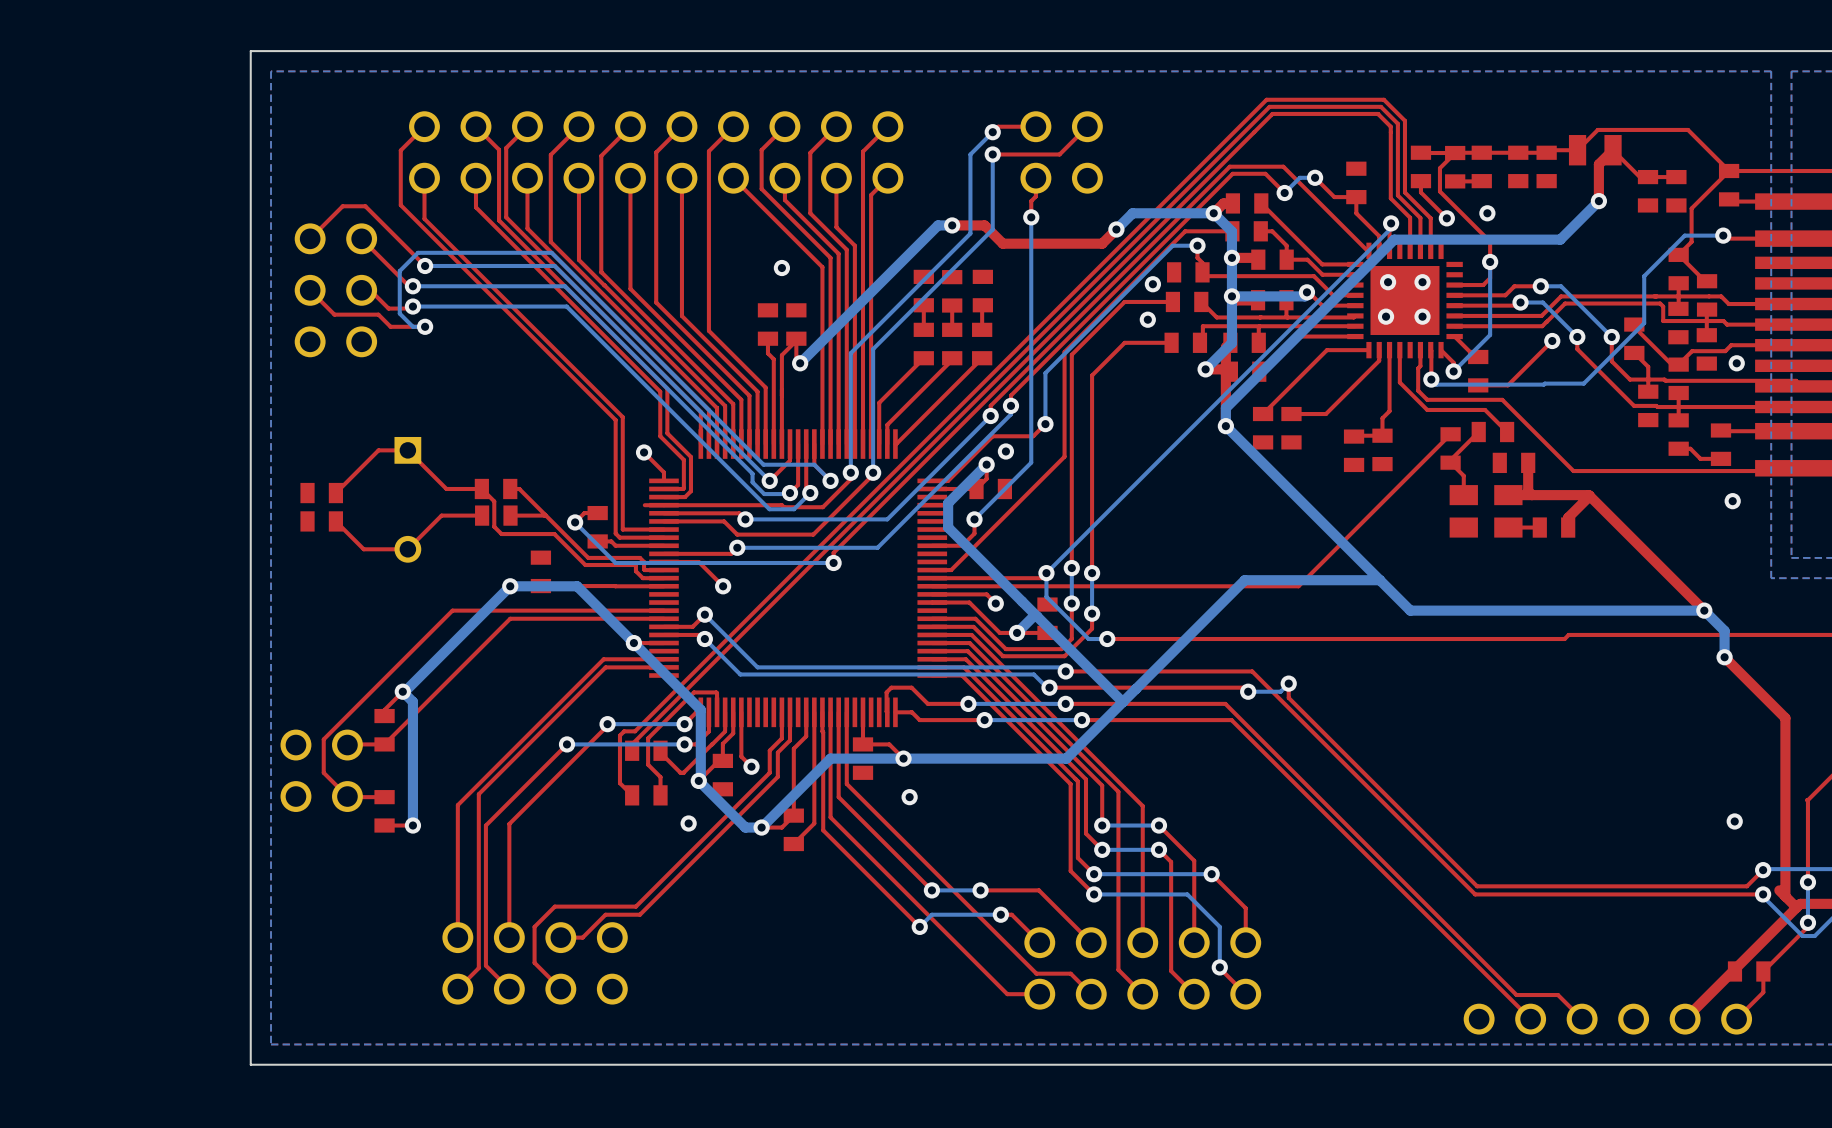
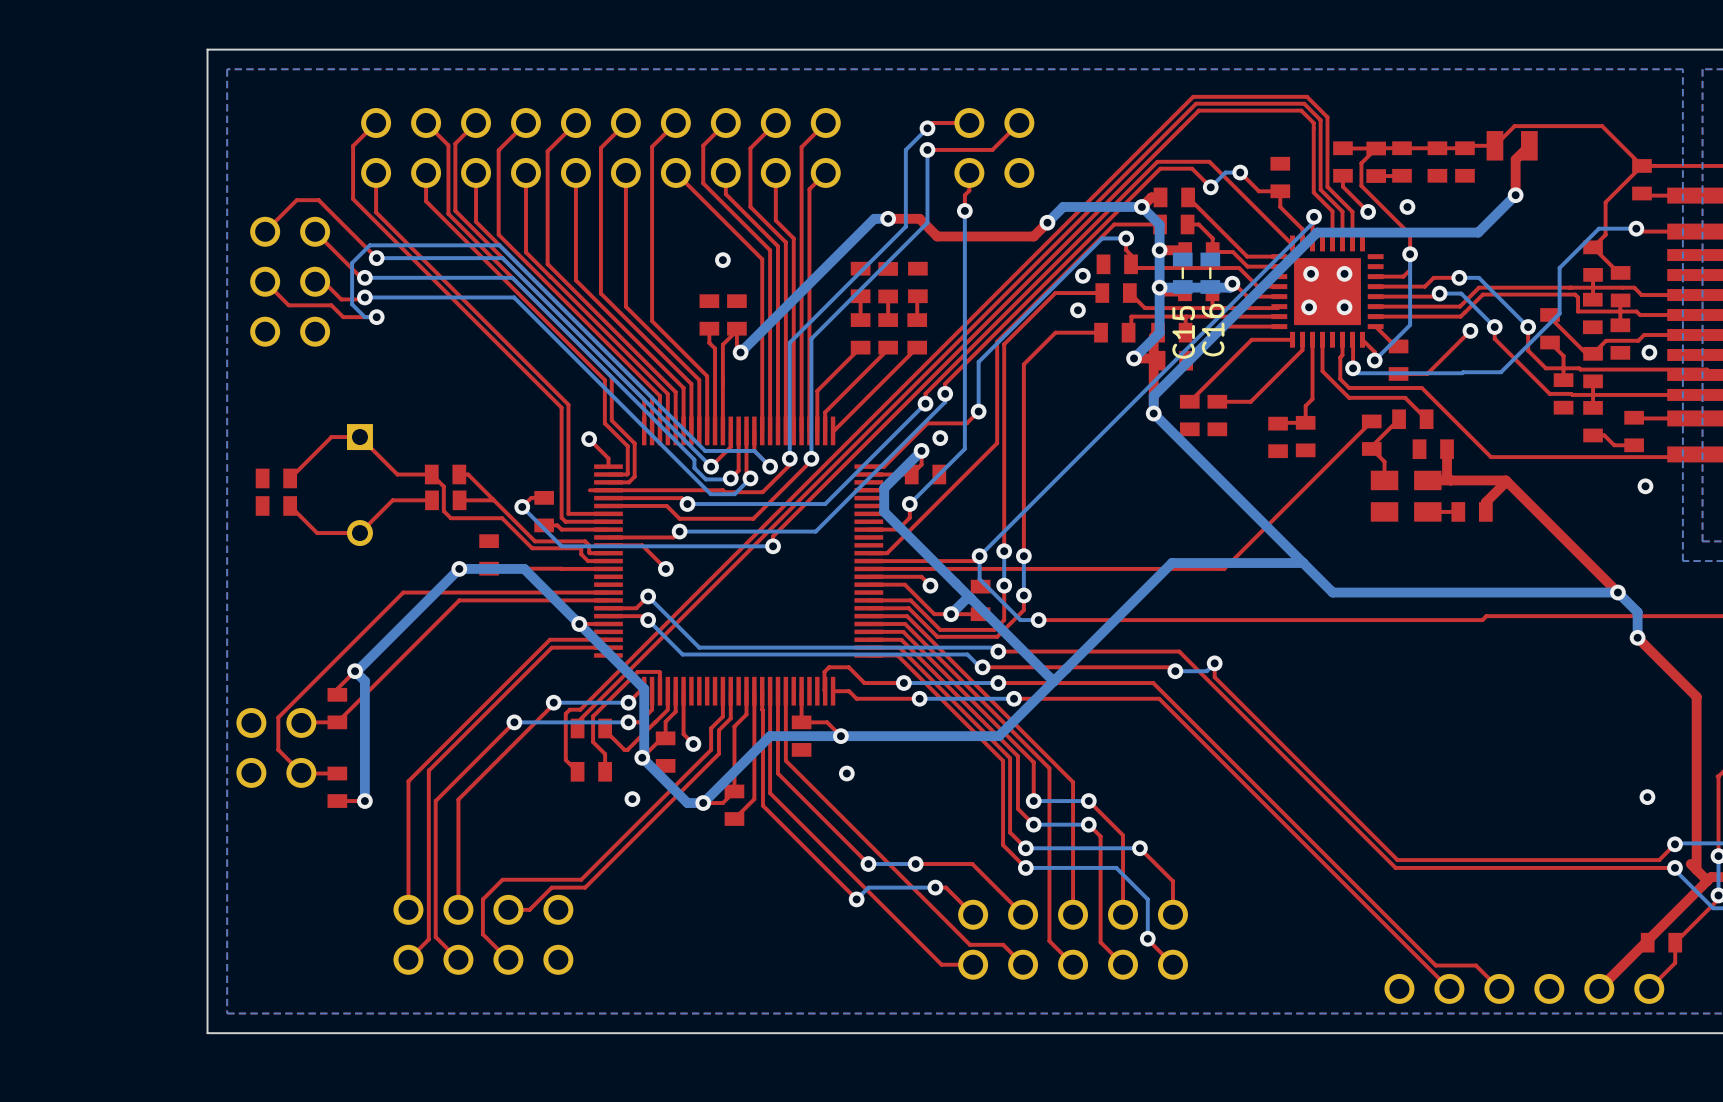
top track: (1613, 150) (1639, 177) (1676, 177) -> none
C16 side: top (1648, 191) -> bottom (1210, 273)
C15 side: top (1676, 191) -> bottom (1182, 273)

